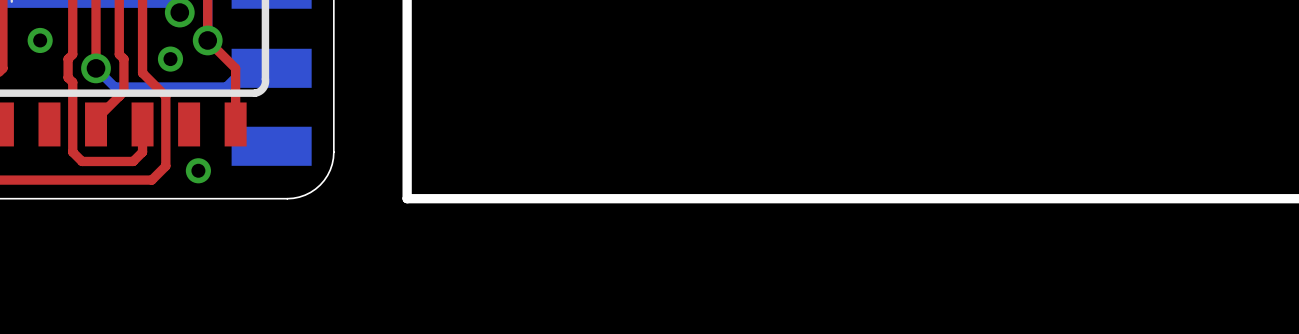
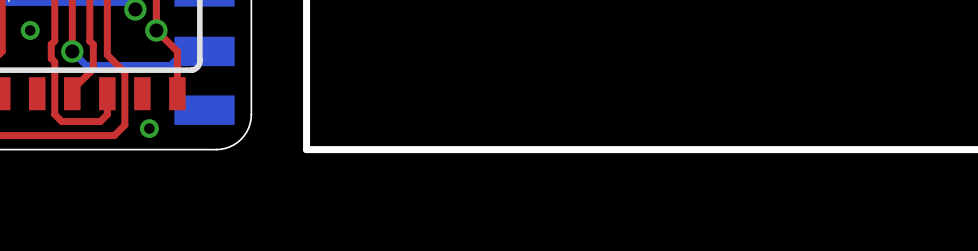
via: (170, 59) -> none

